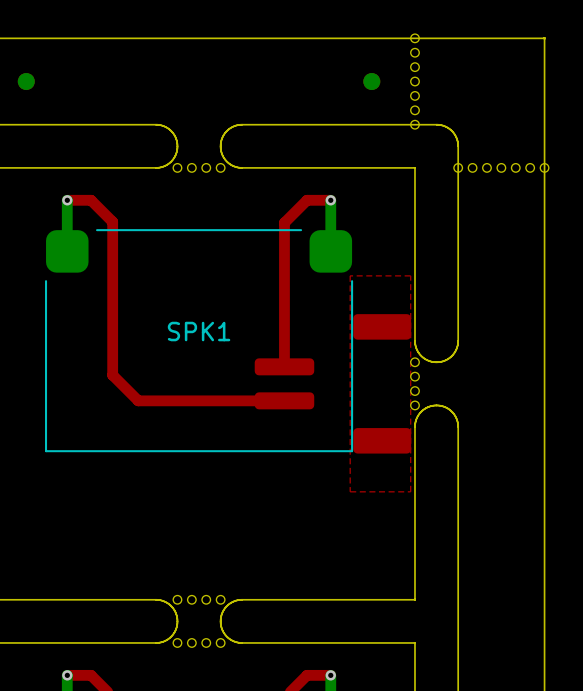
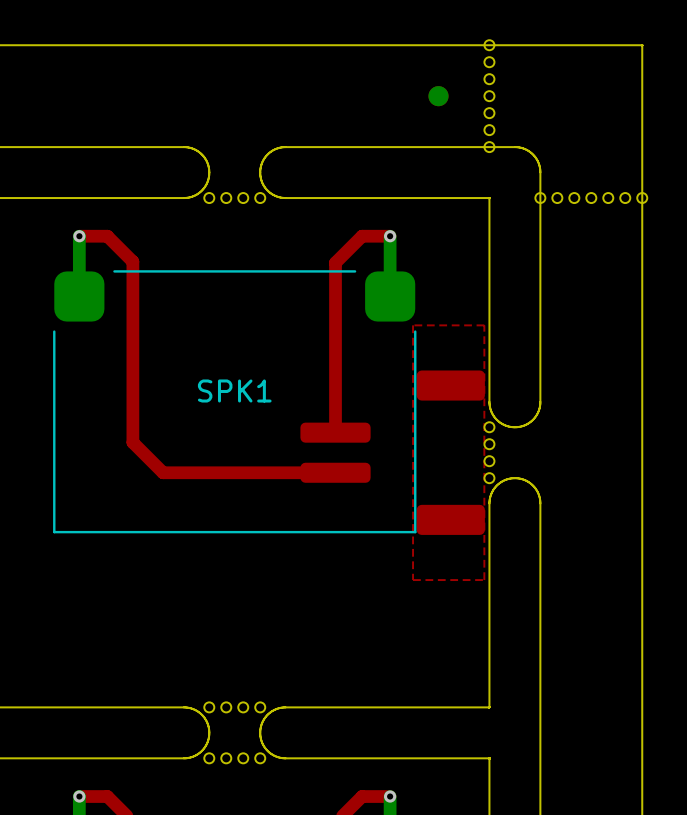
part: (26, 81) -> none

